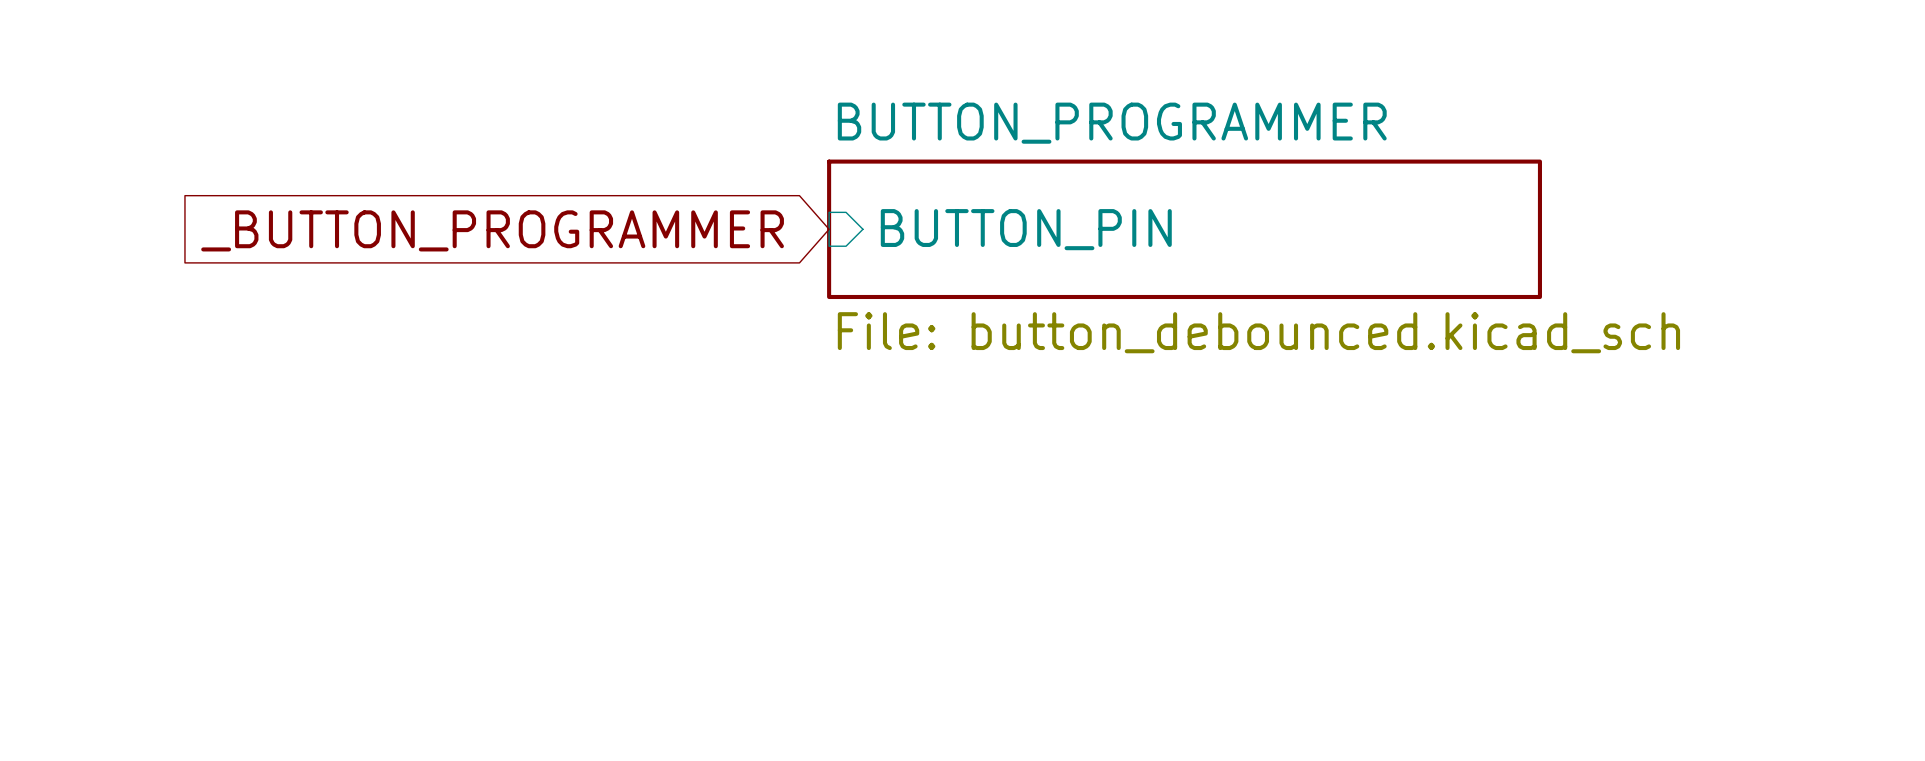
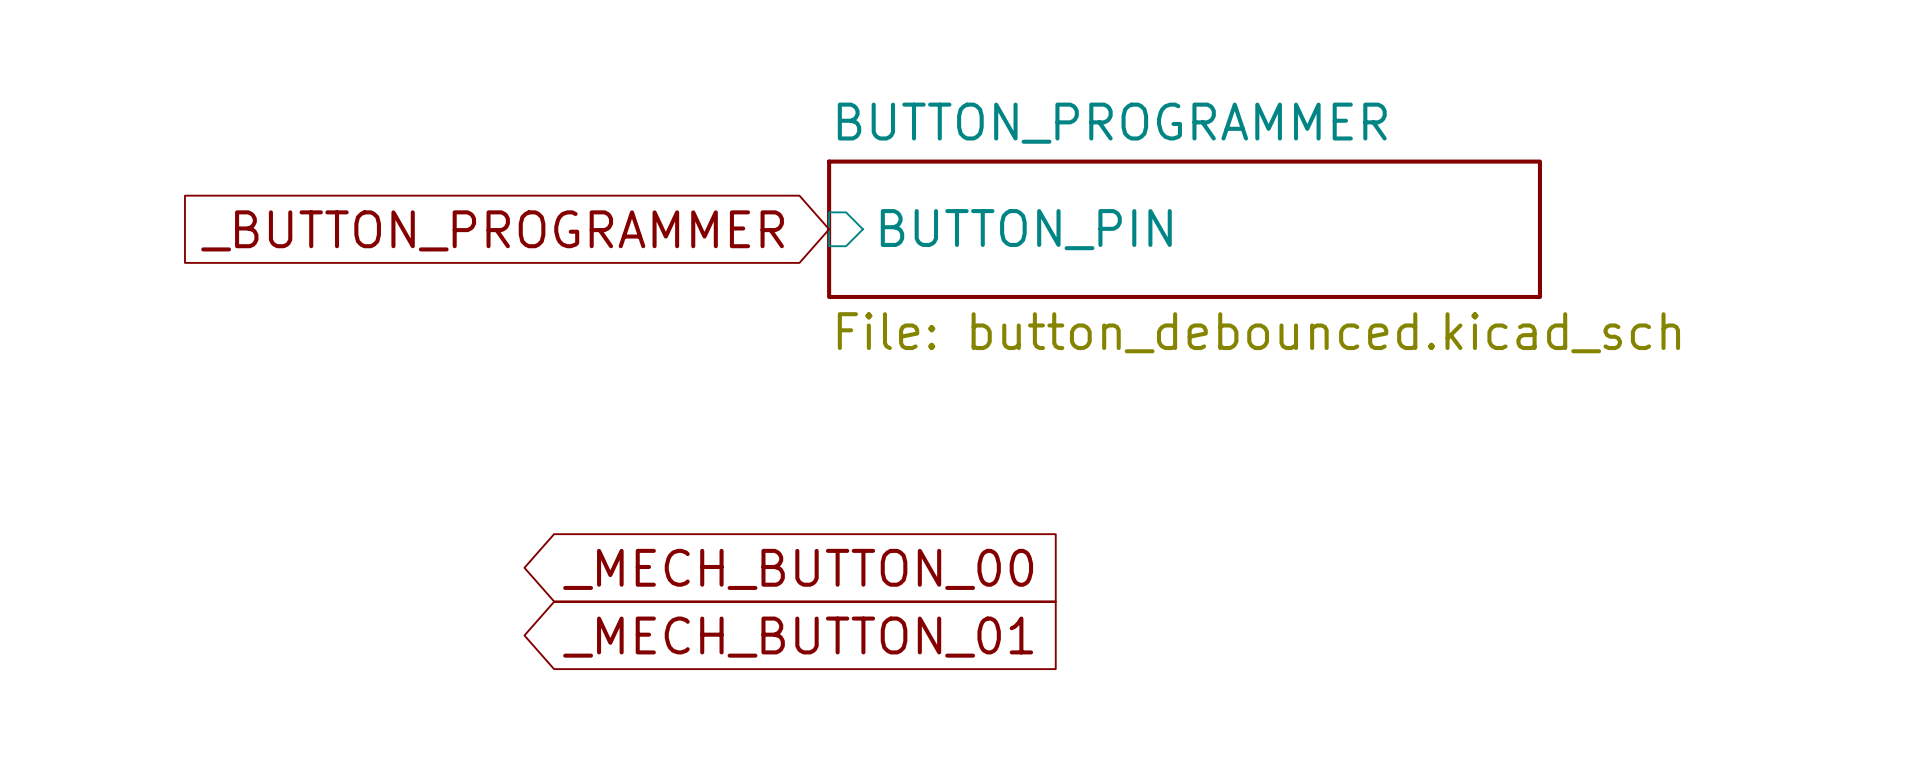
global label: none -> _MECH_BUTTON_00 (798, 569)
global label: none -> _MECH_BUTTON_01 (798, 637)

